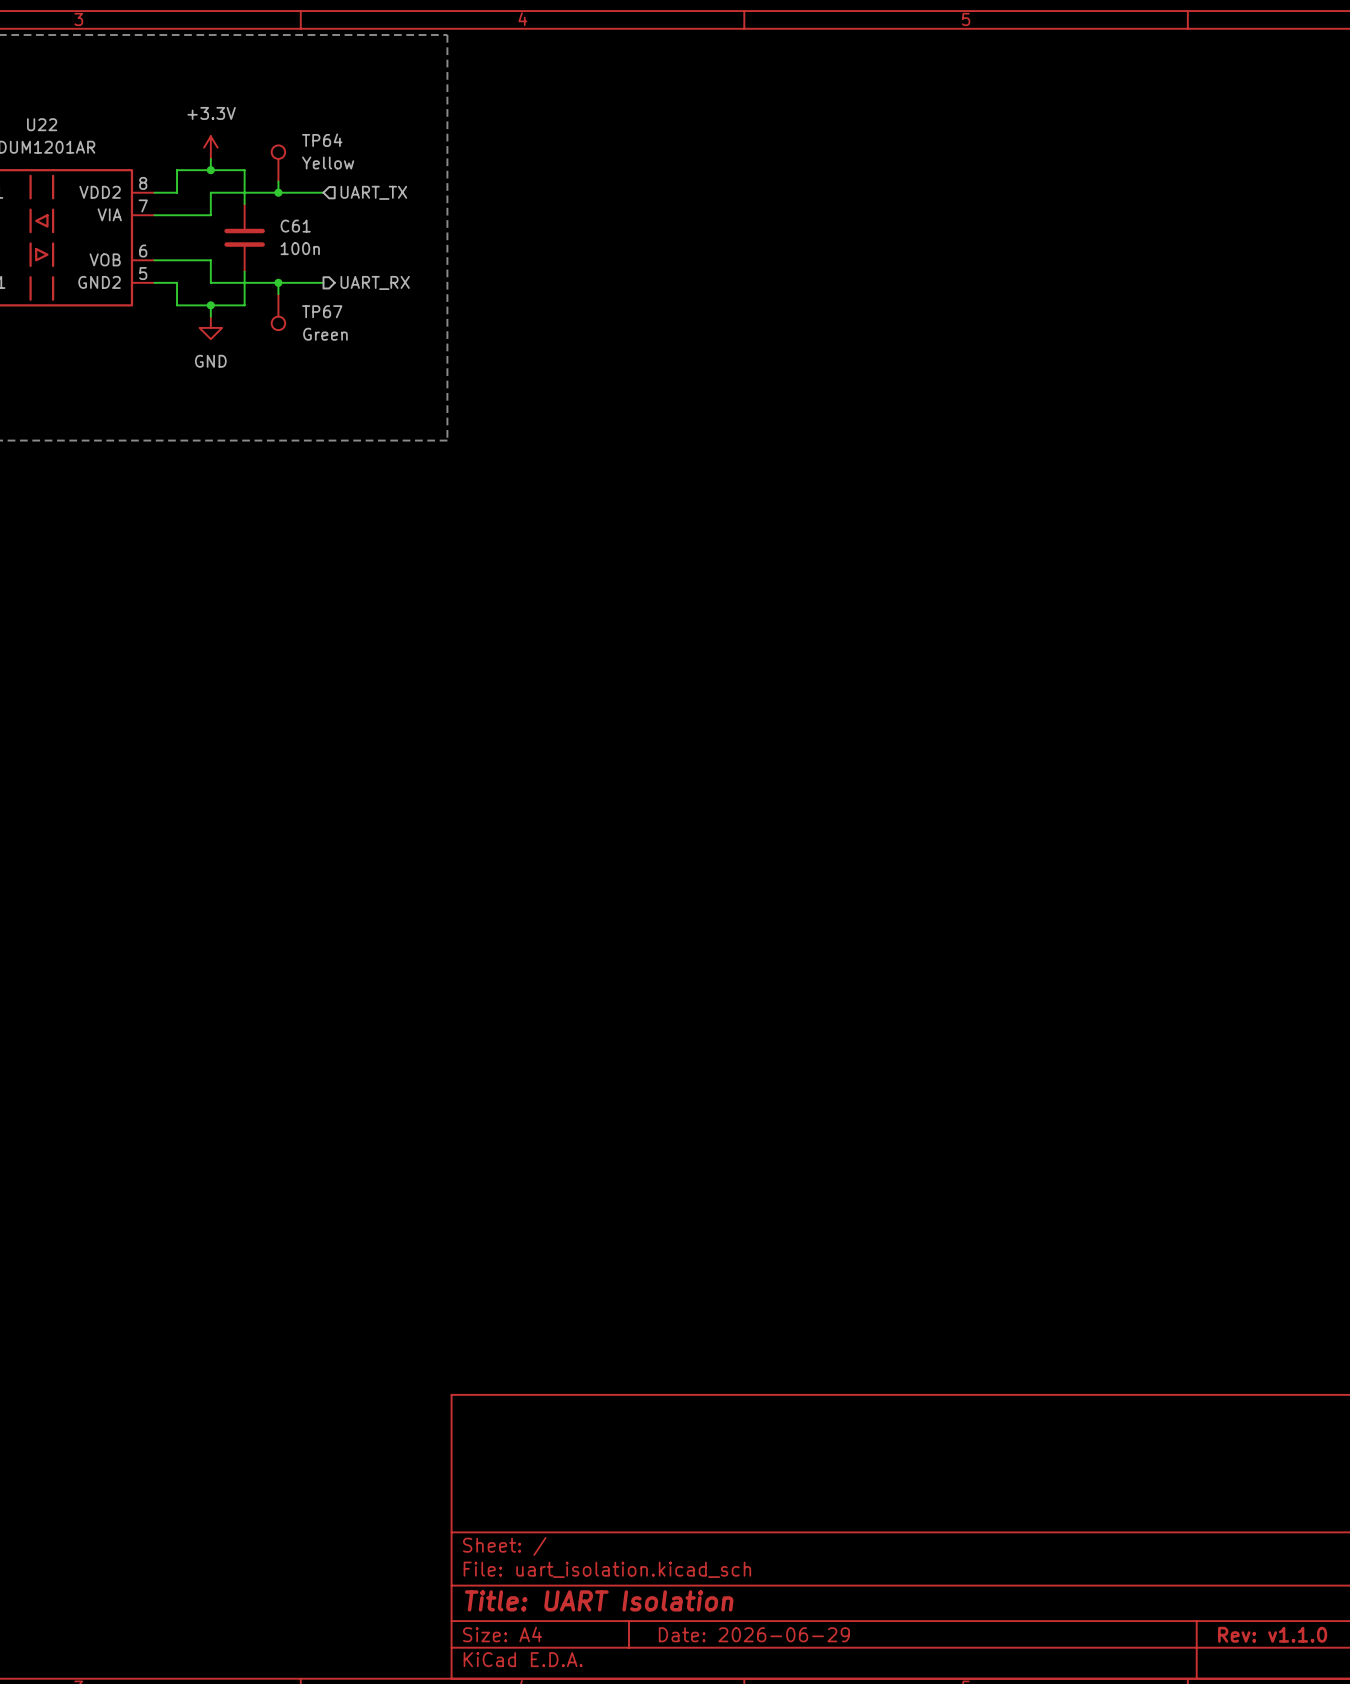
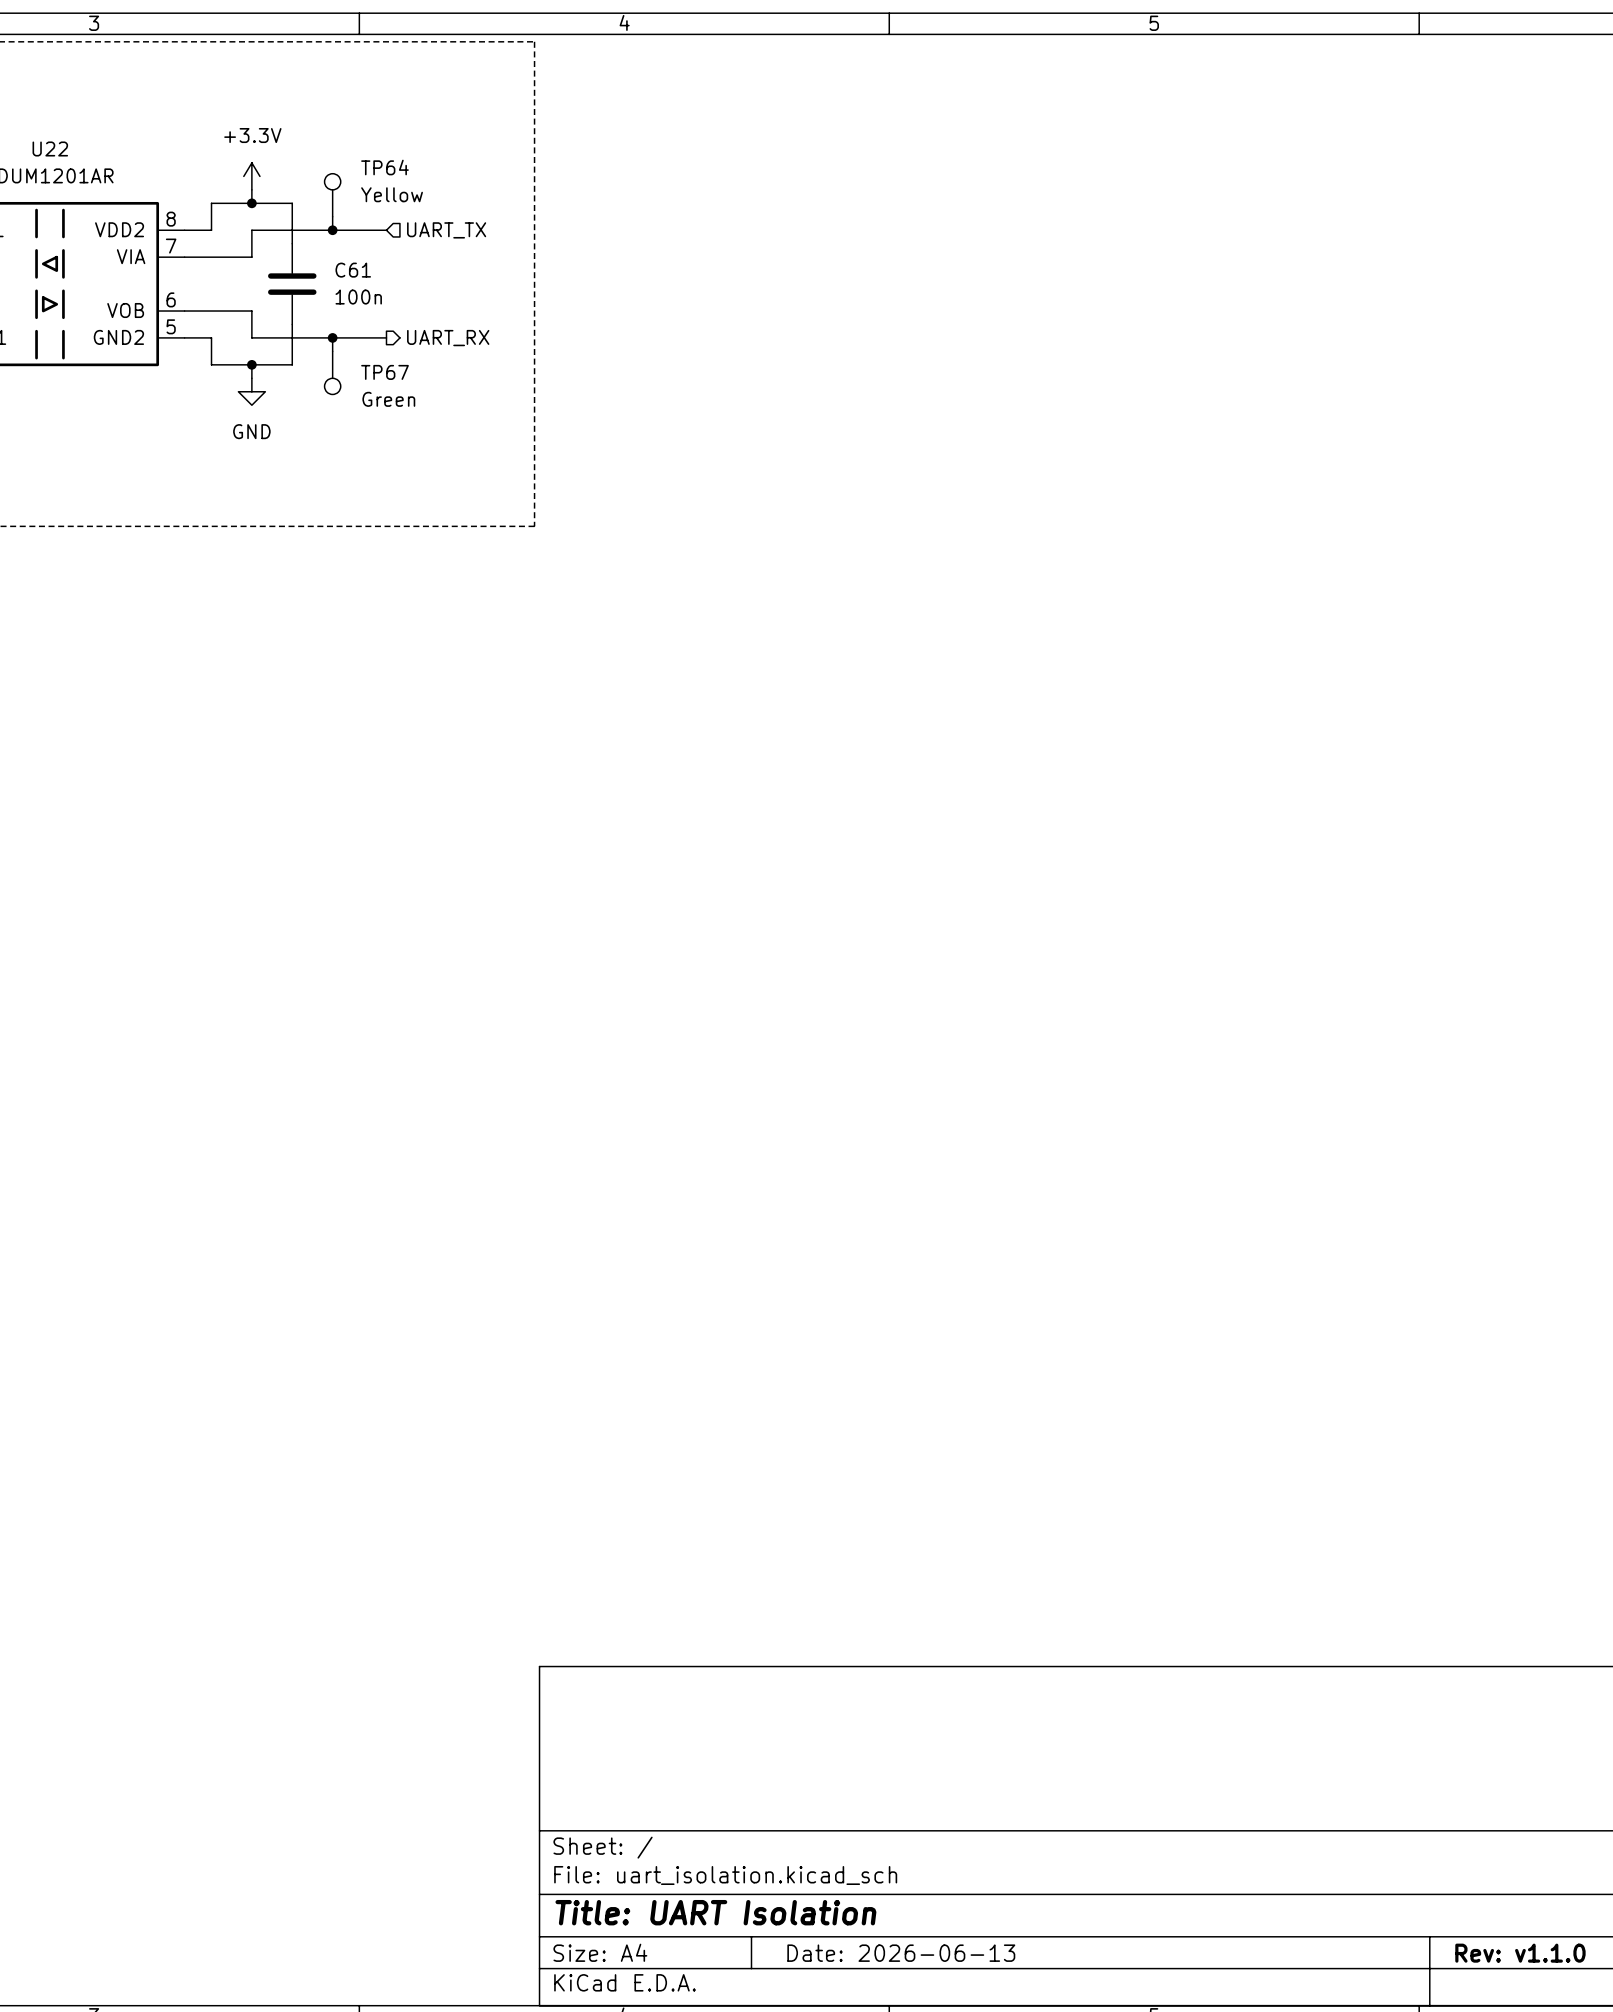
title block: Date: 2026-06-29 (754, 1634) -> Date: 2026-06-13 (901, 1953)

